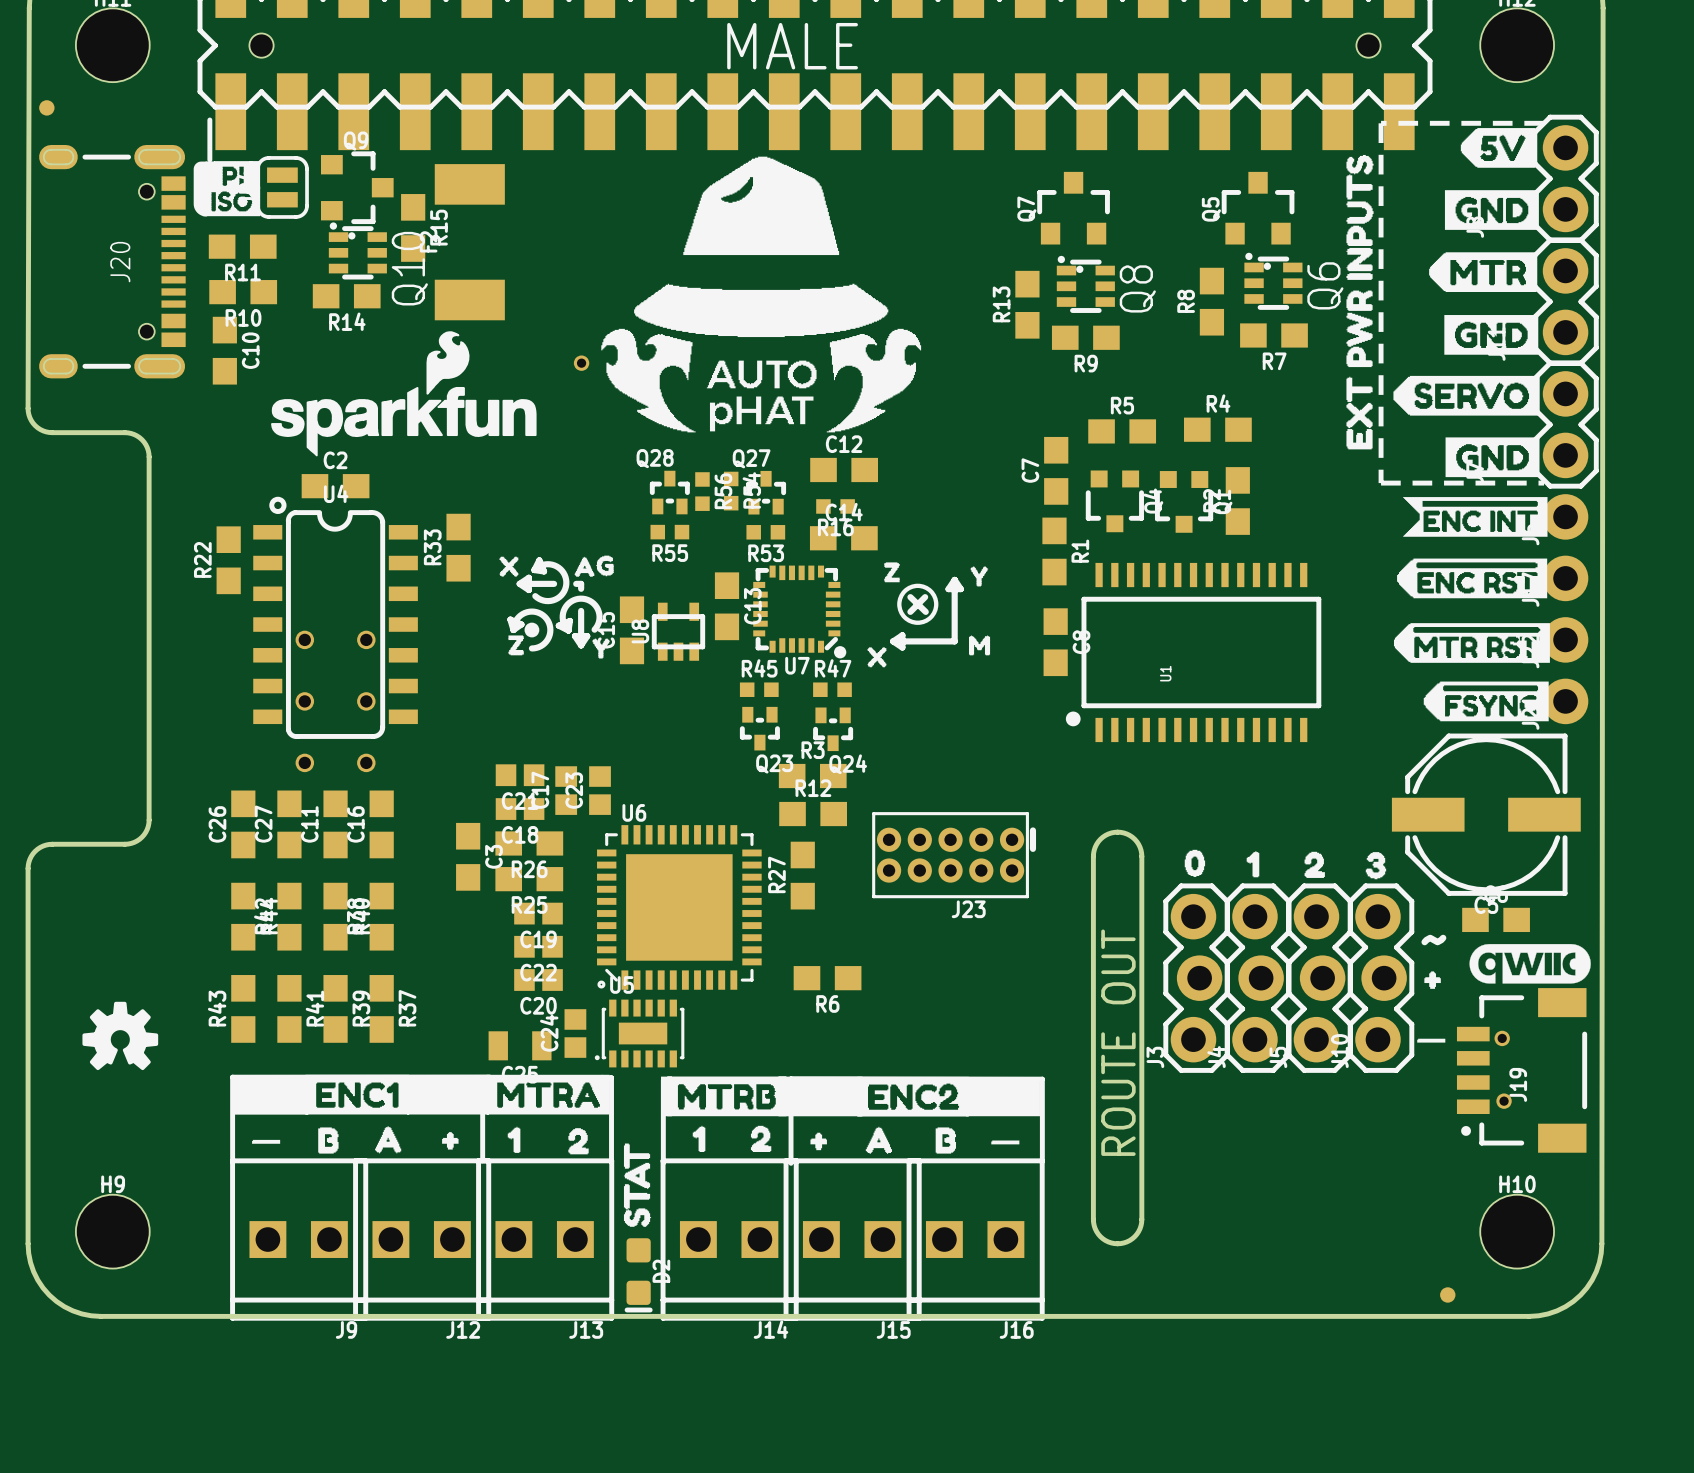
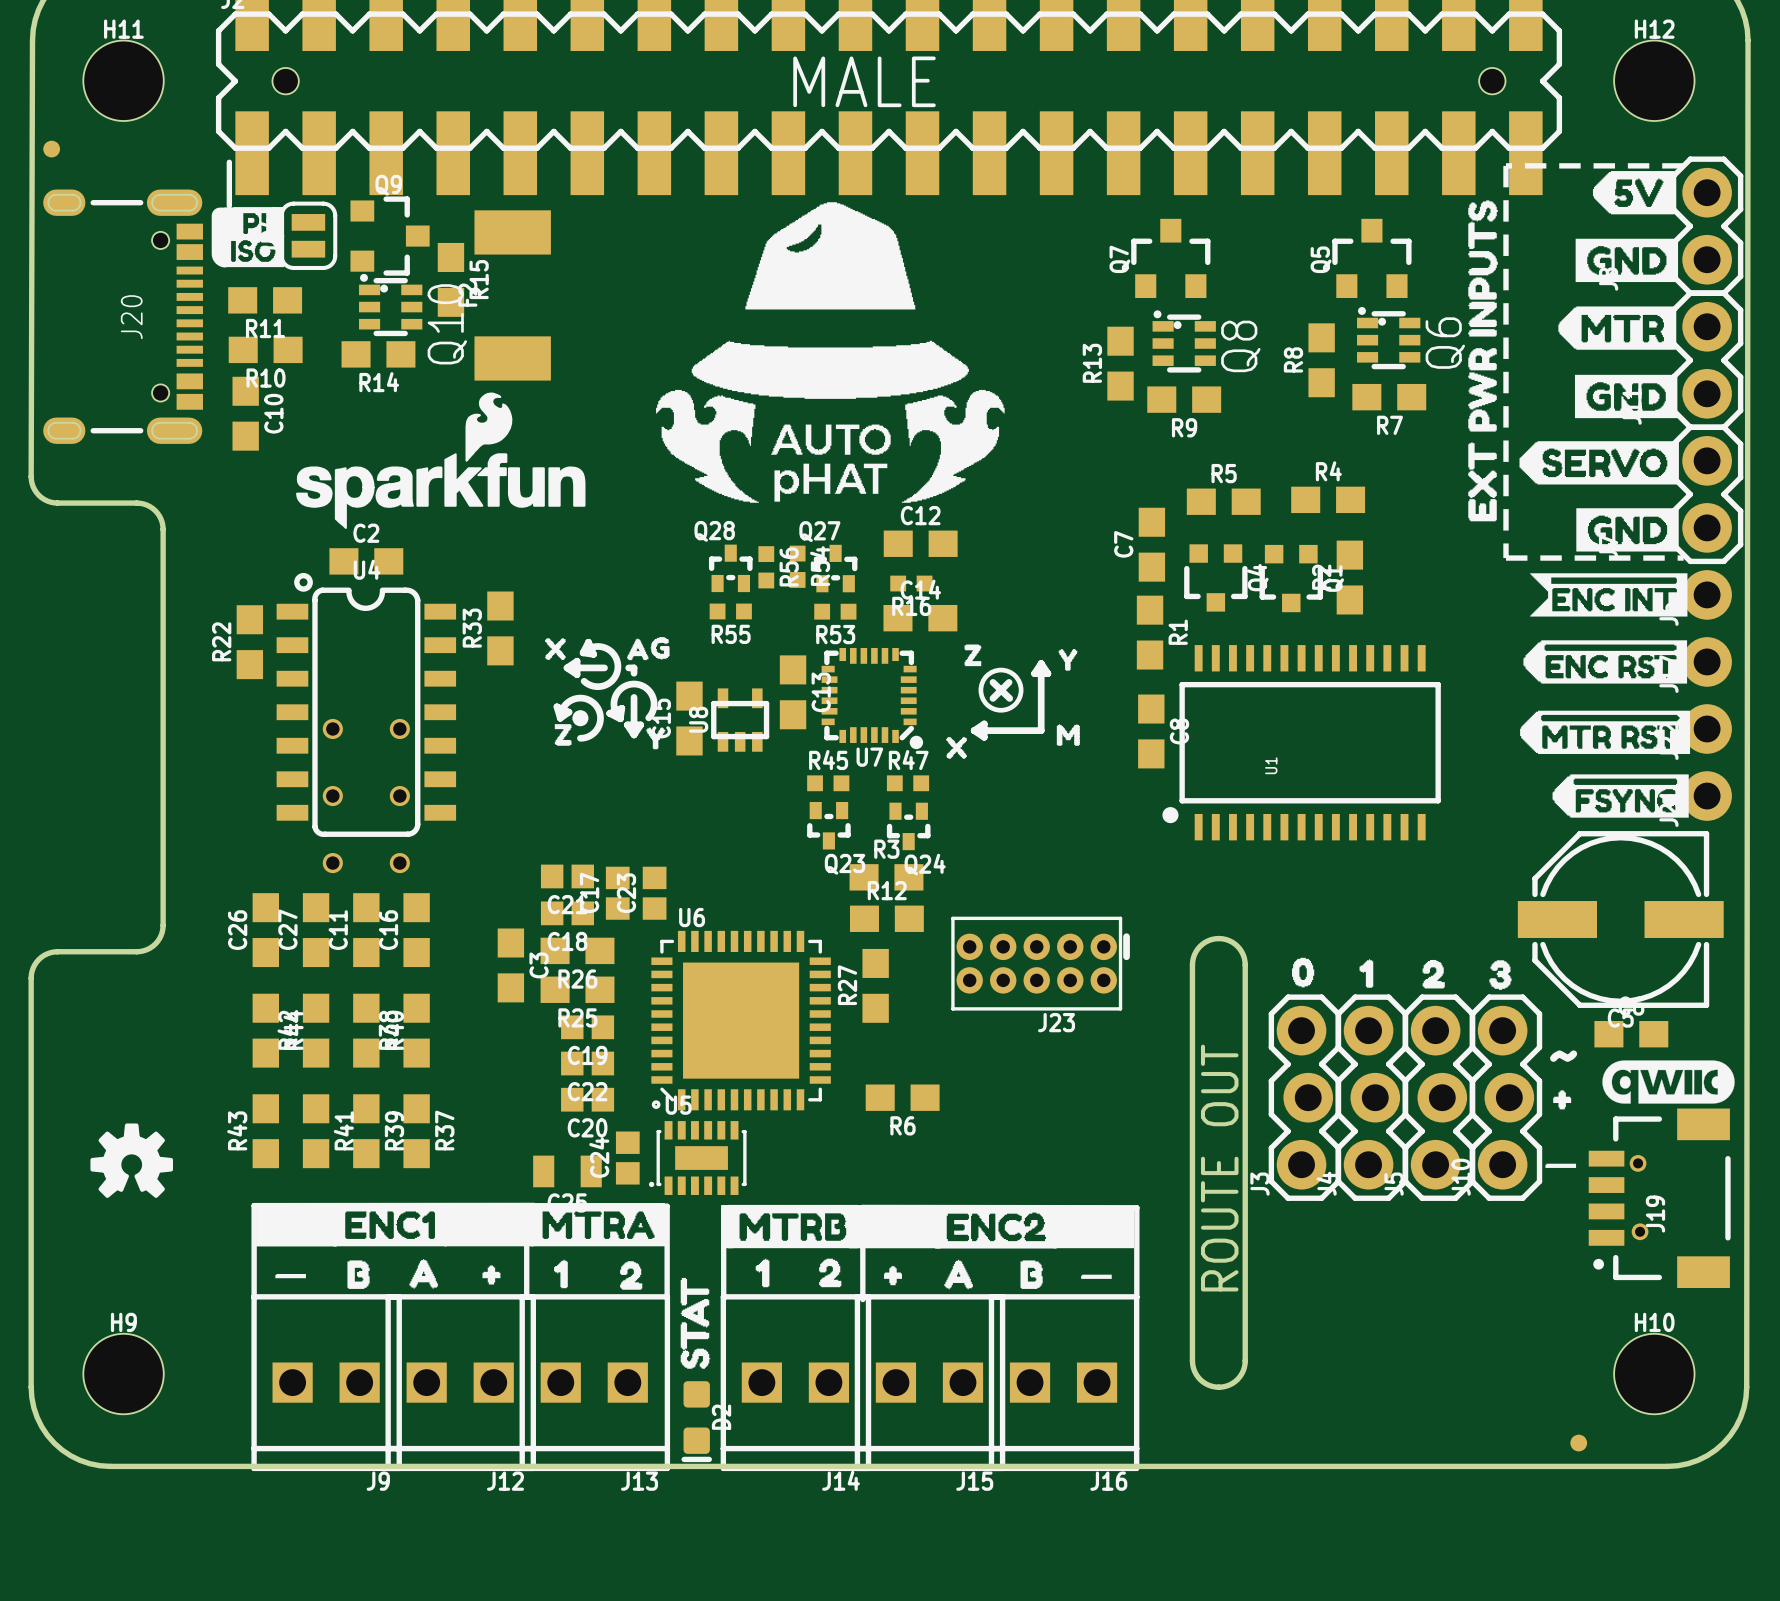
part: (581, 363) -> none

